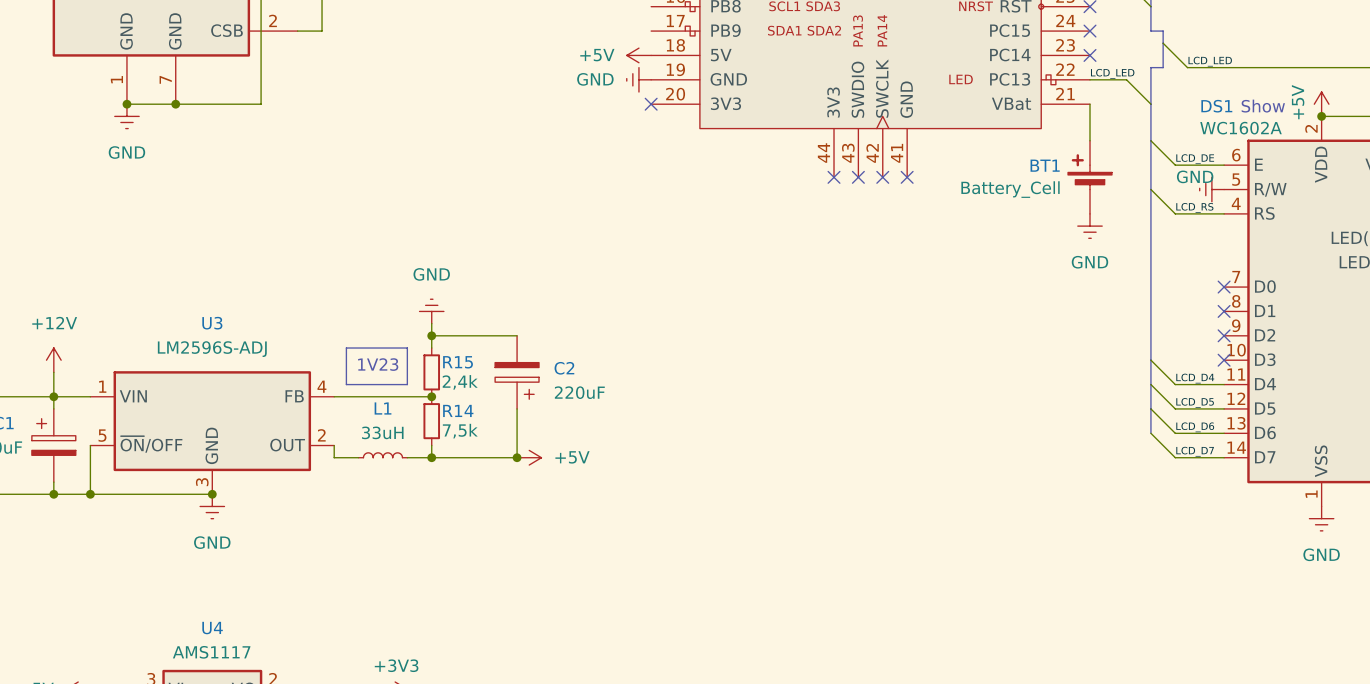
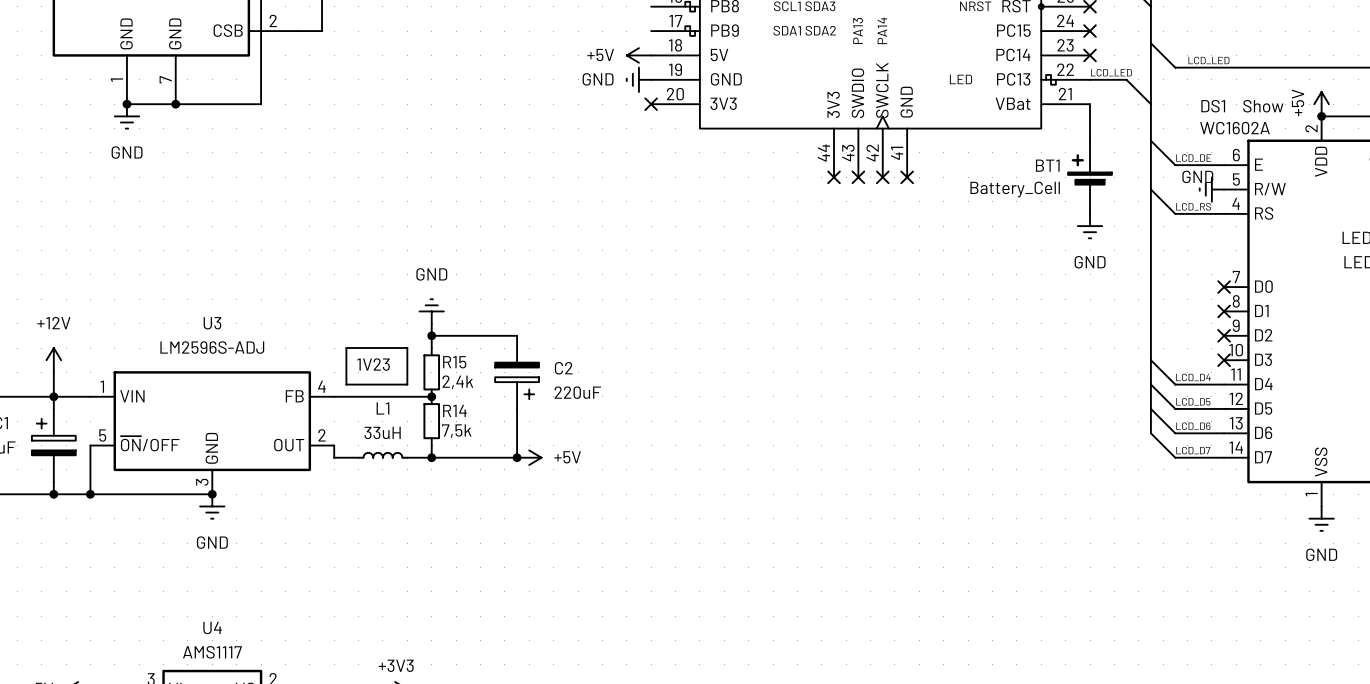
bus: (1150, 31) (1163, 31) (1163, 67) (1150, 67) -> (1150, 31) (1150, 67)
wire: (1163, 43) (1187, 67) -> (1150, 43) (1175, 67) (1187, 67)

